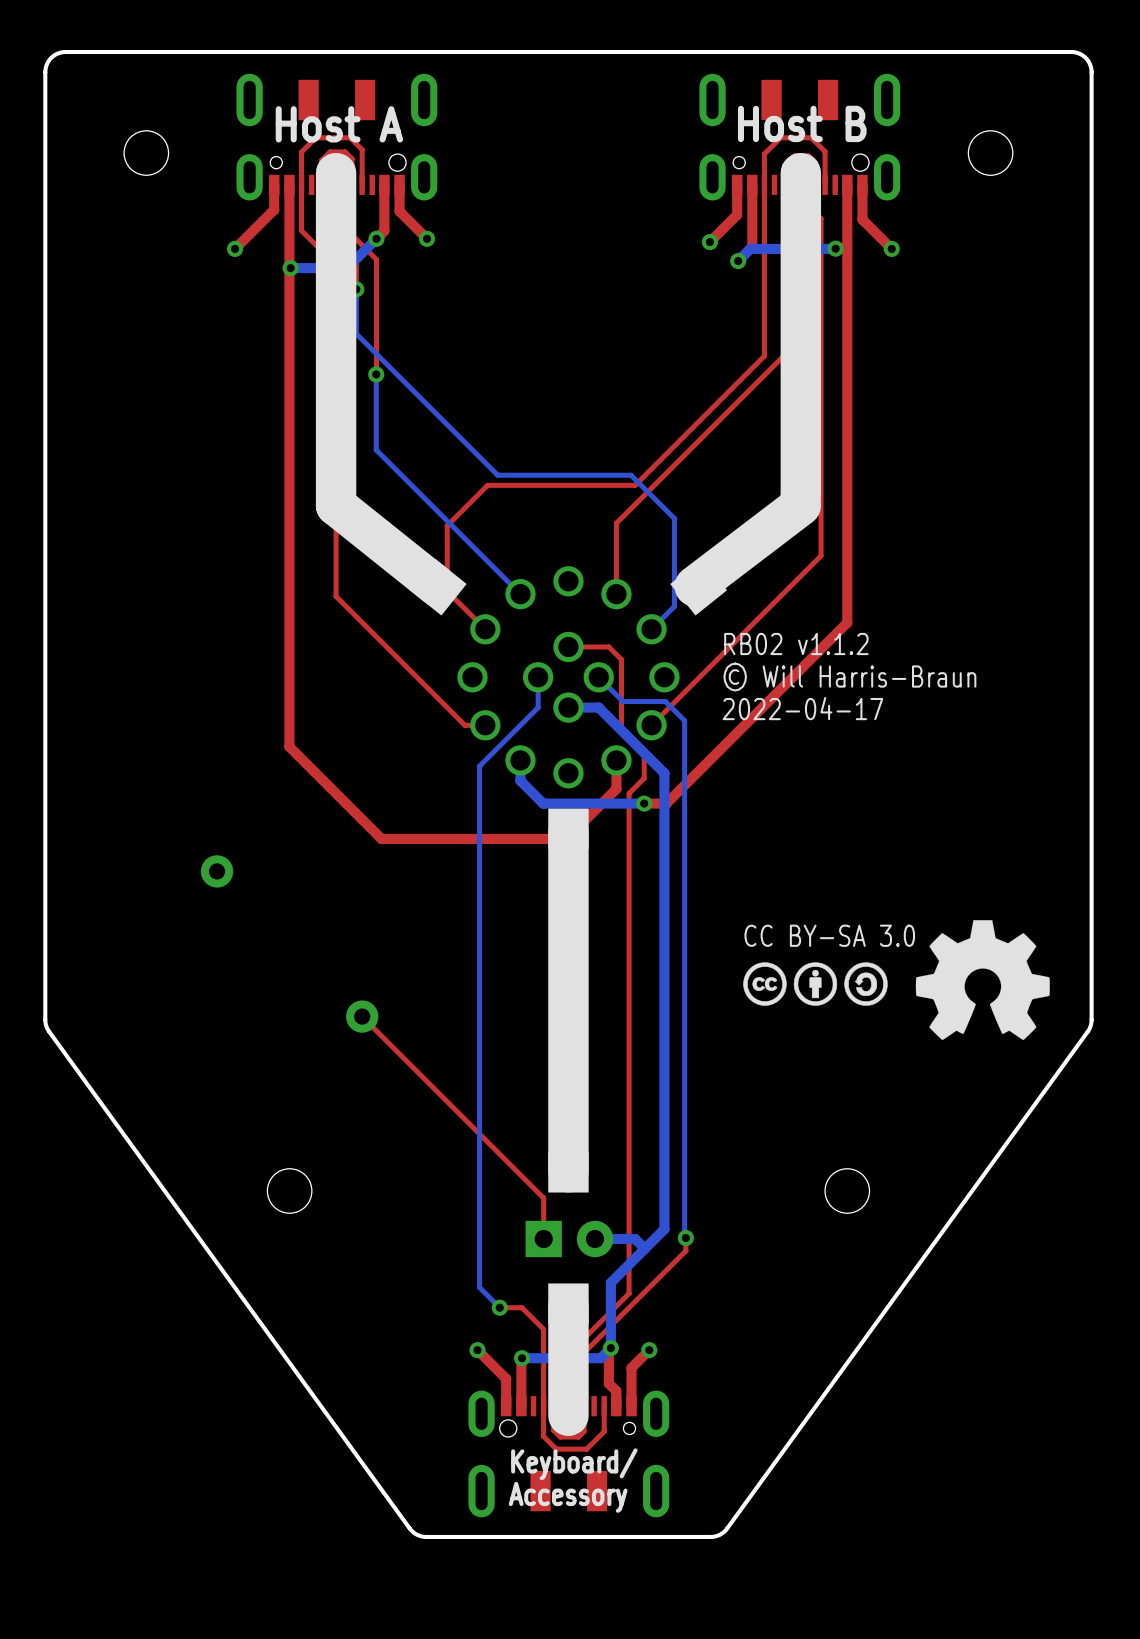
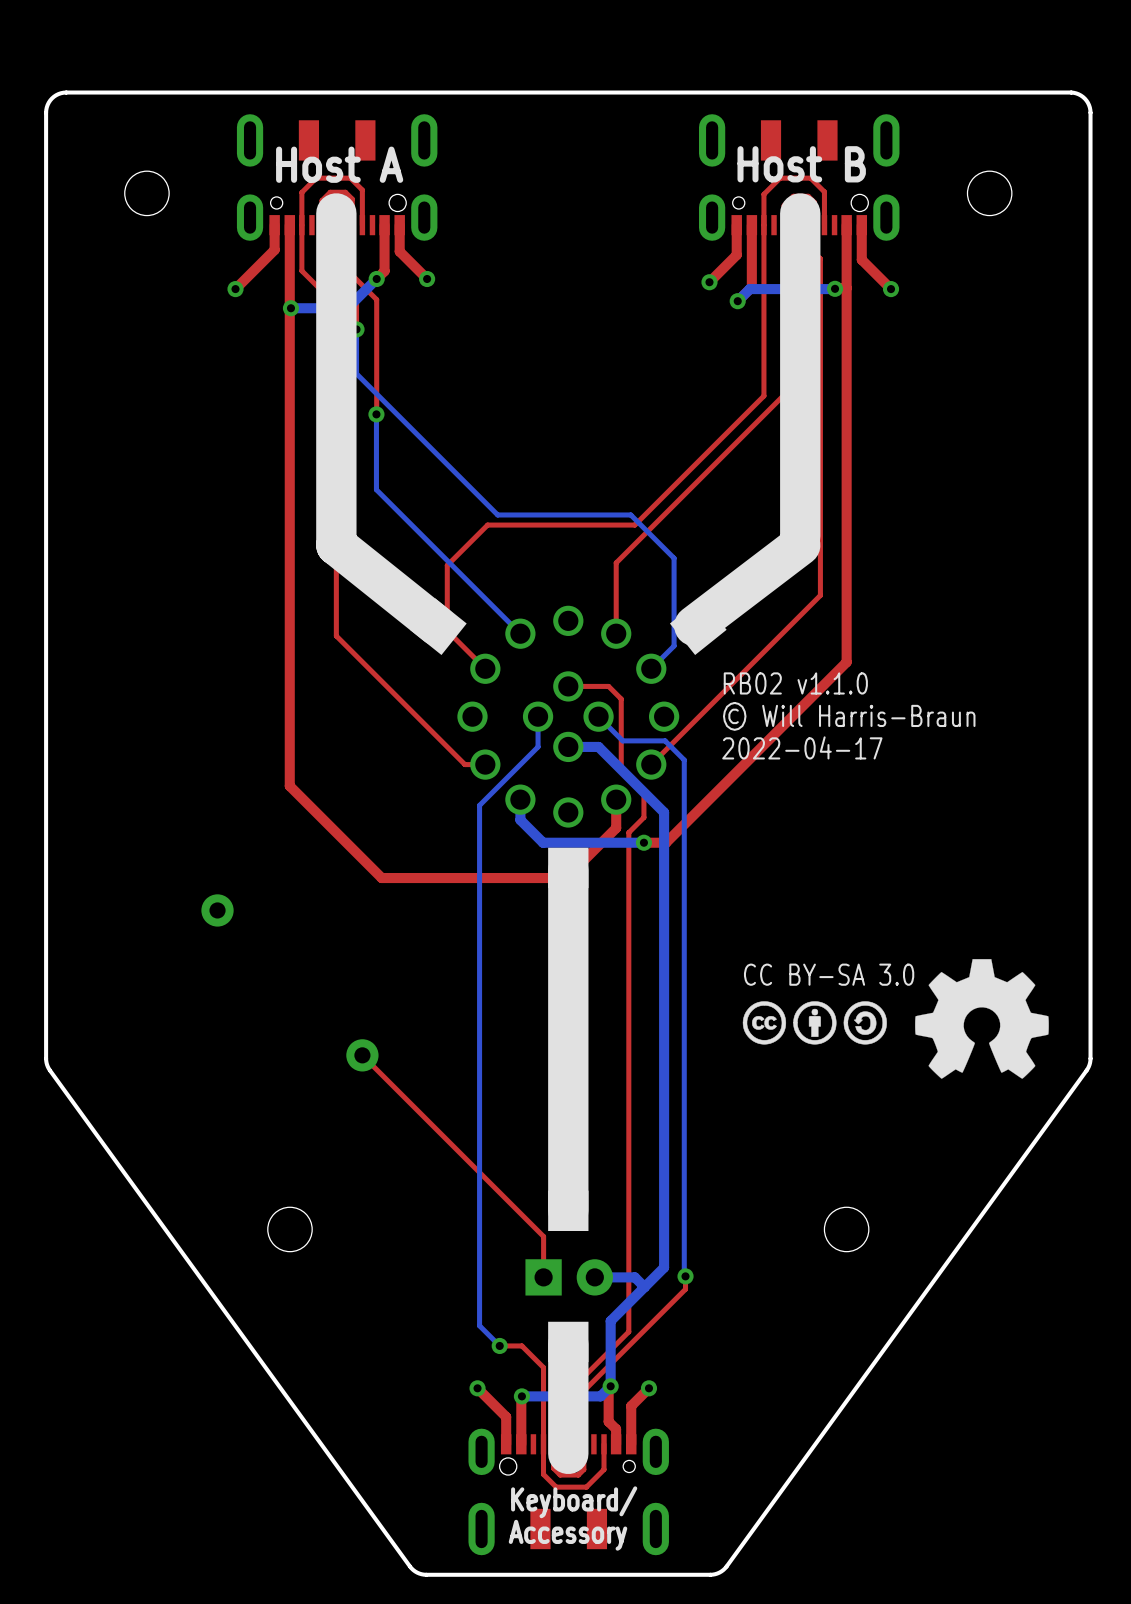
text: RB02 v1.1.2 (796, 644) -> RB02 v1.1.0 (795, 683)

